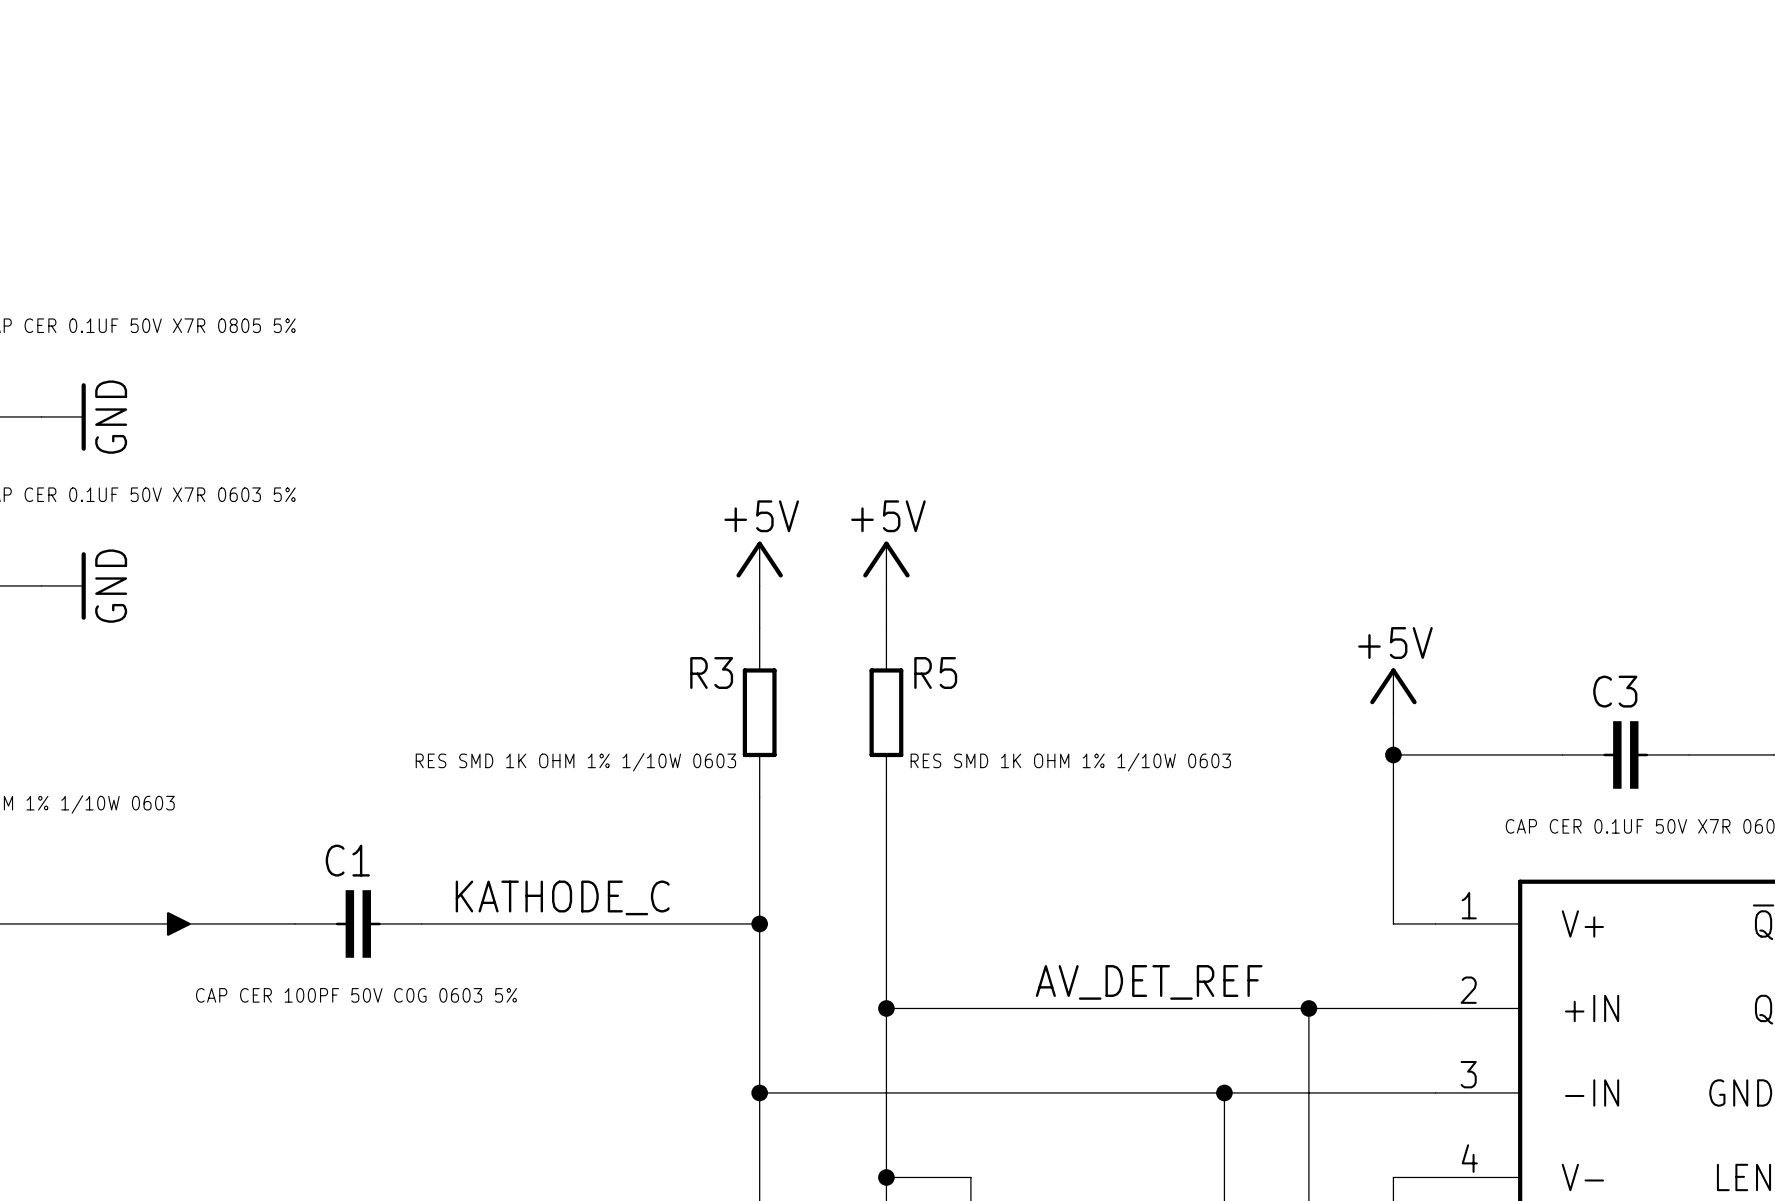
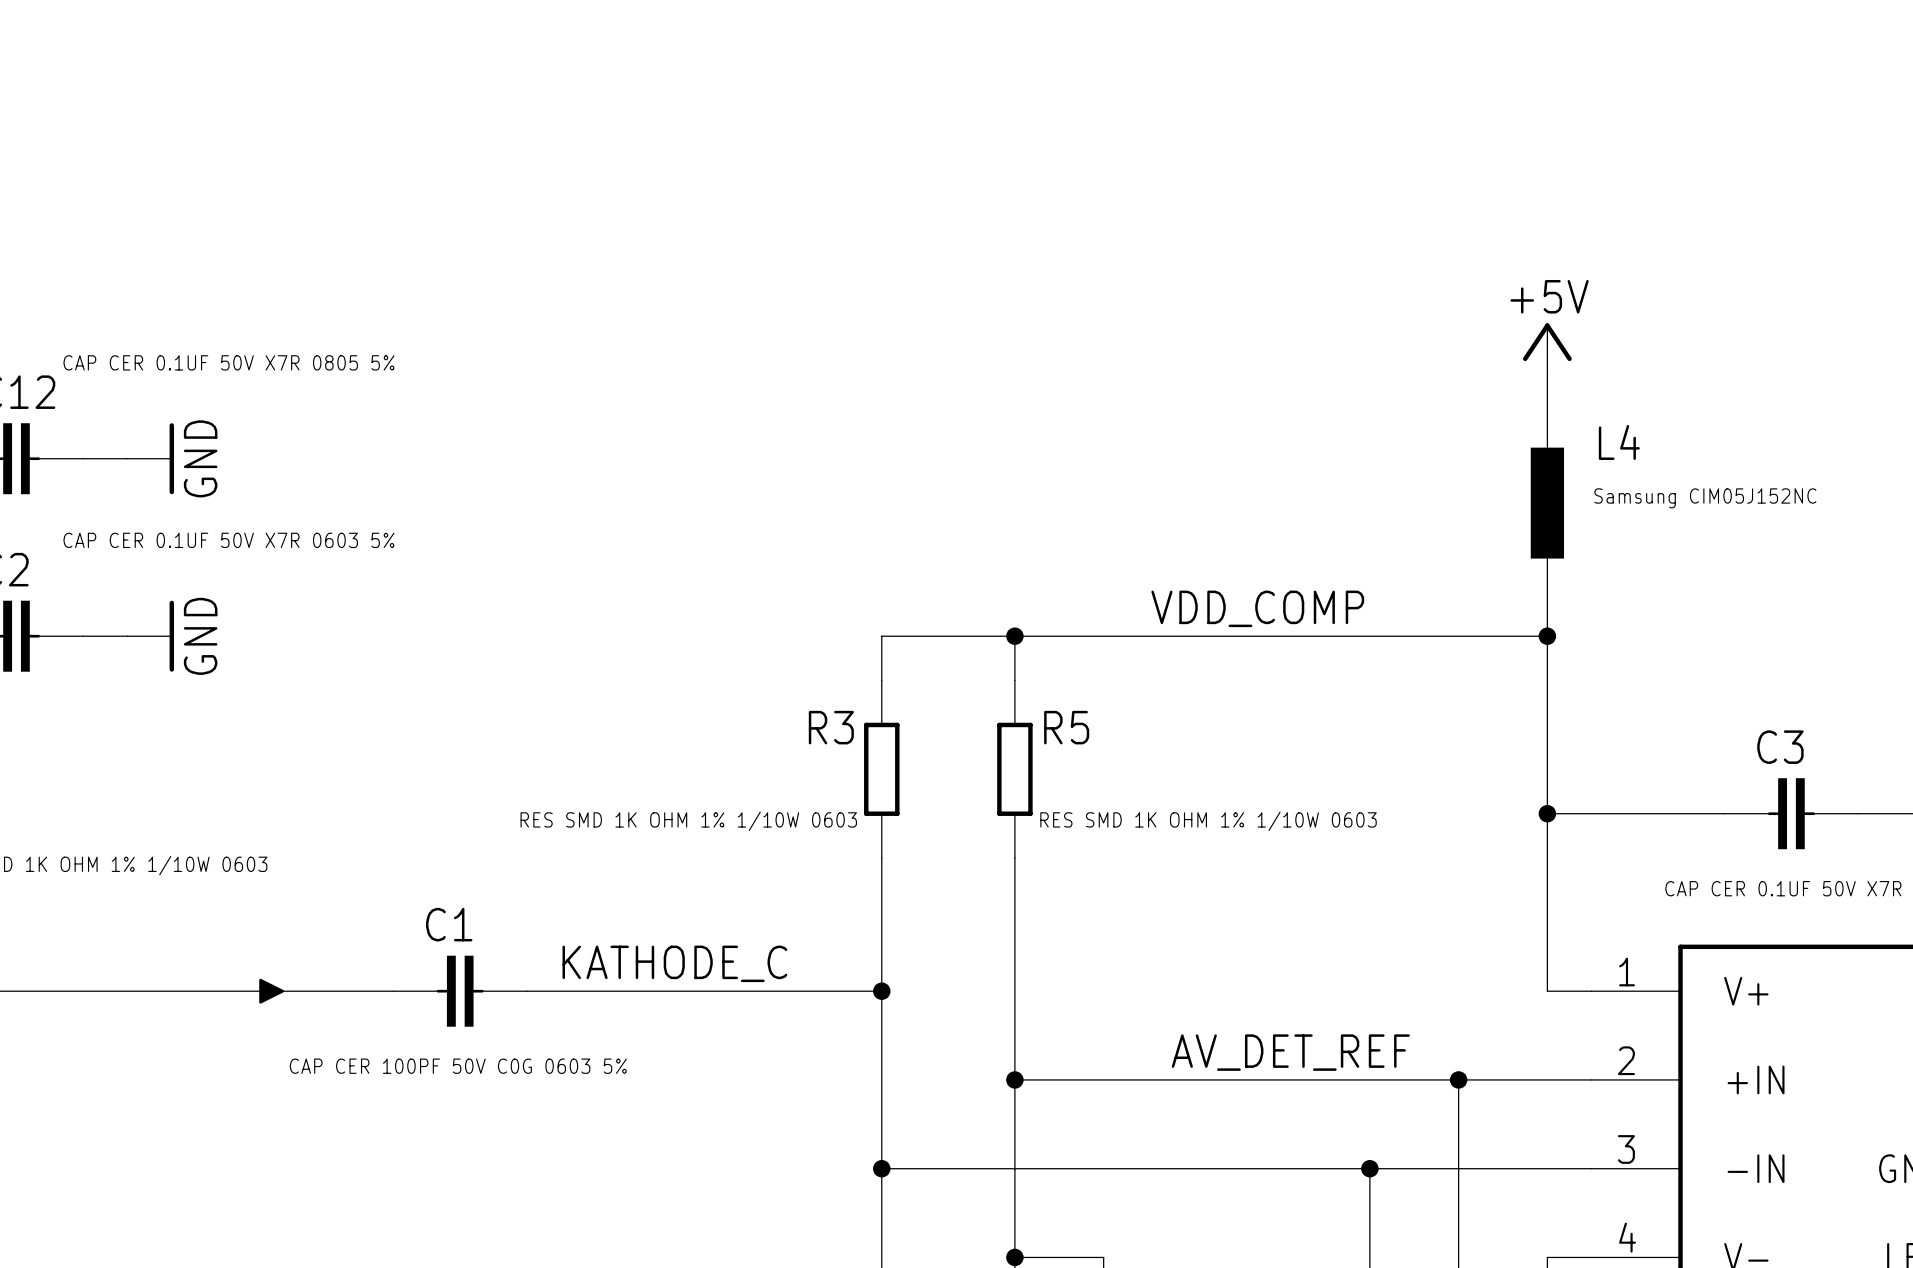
power symbol: none -> +5V (1547, 346)
wire: none -> (1547, 369) (1547, 414)
L4: none -> Samsung CIM05J152NC (1547, 503)
wire: none -> (1547, 591) (1547, 769)
label: none -> VDD_COMP (1257, 608)
power symbol: +5V (759, 563) -> none
power symbol: +5V (886, 563) -> none
wire: none -> (881, 636) (1547, 636)
junction: none -> (1014, 636)
junction: none -> (1547, 636)
power symbol: +5V (1393, 690) -> none

